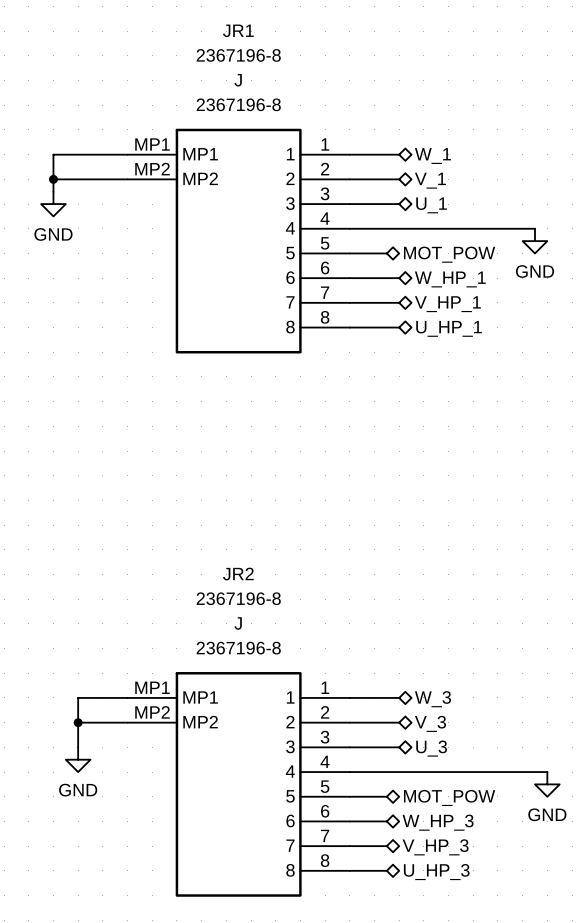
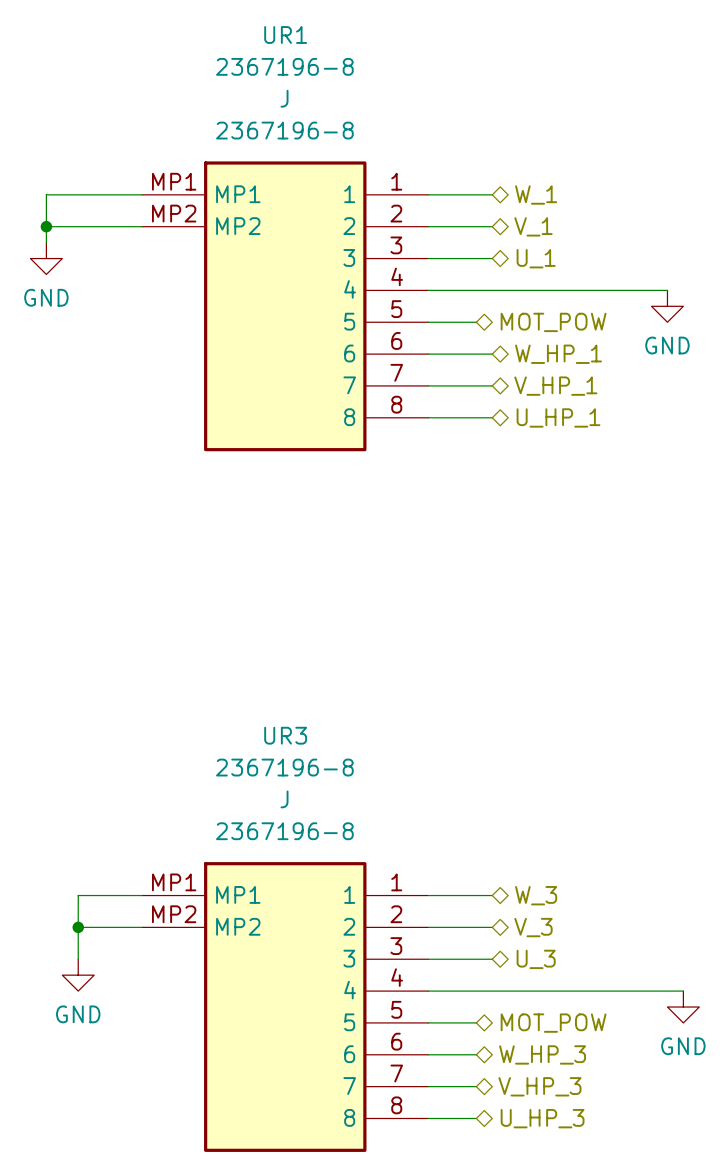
JR1 name: JR1 (238, 30) -> UR1 (285, 35)
JR2 name: JR2 (238, 574) -> UR3 (285, 735)

